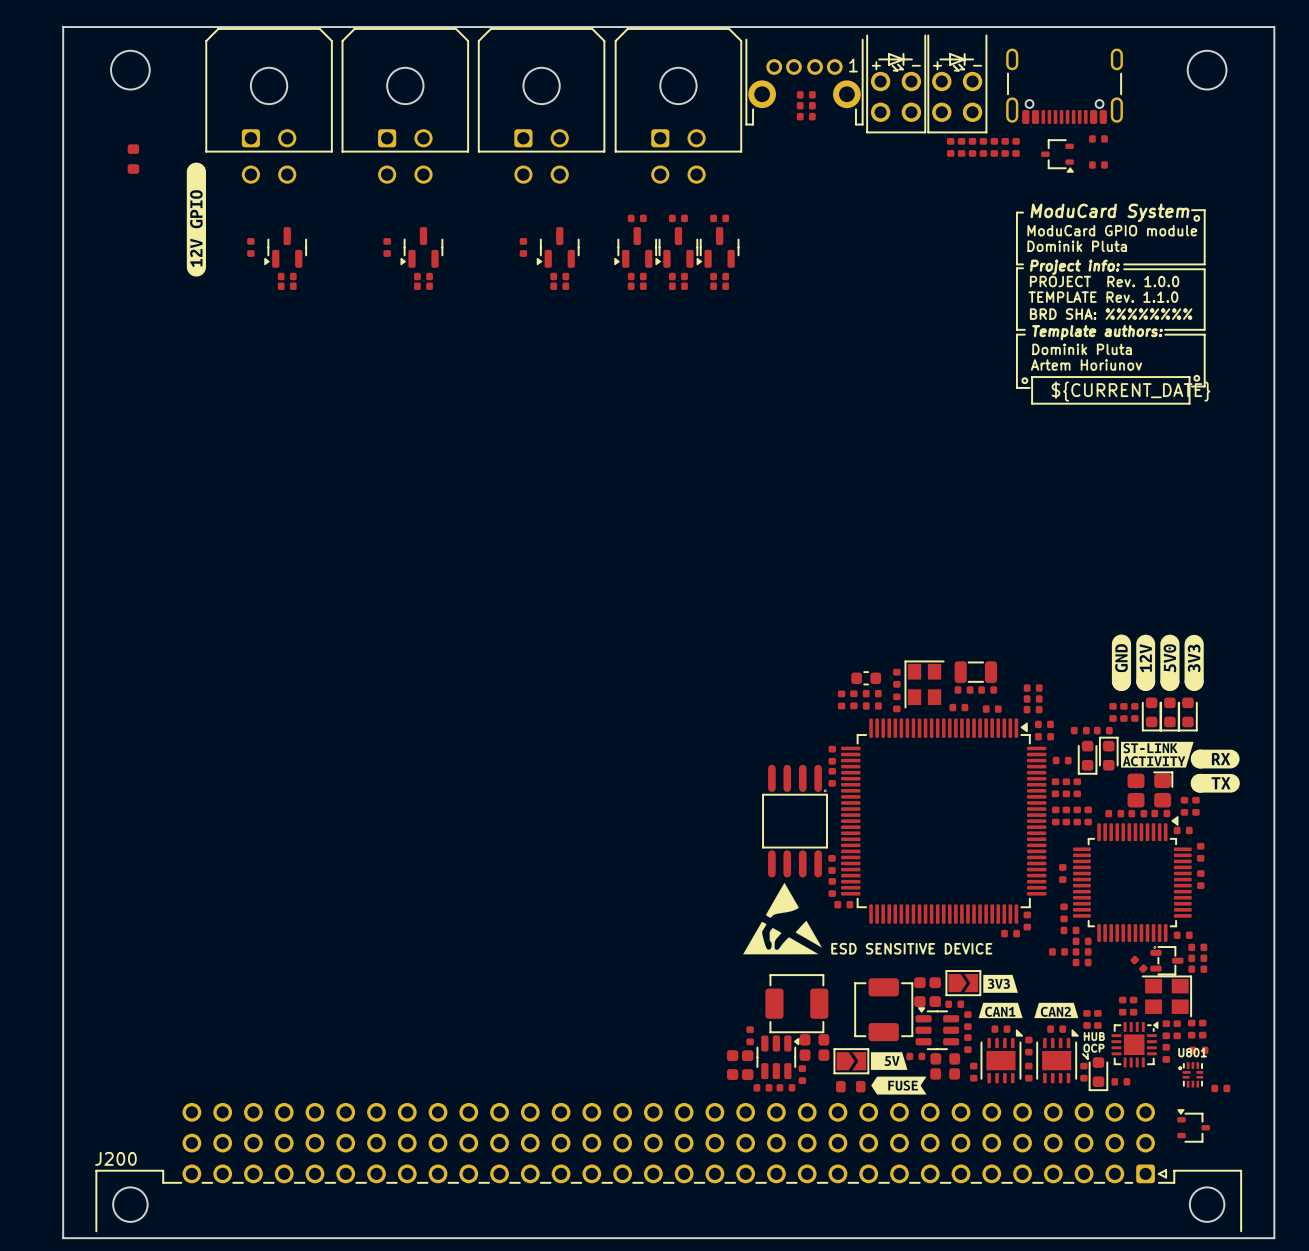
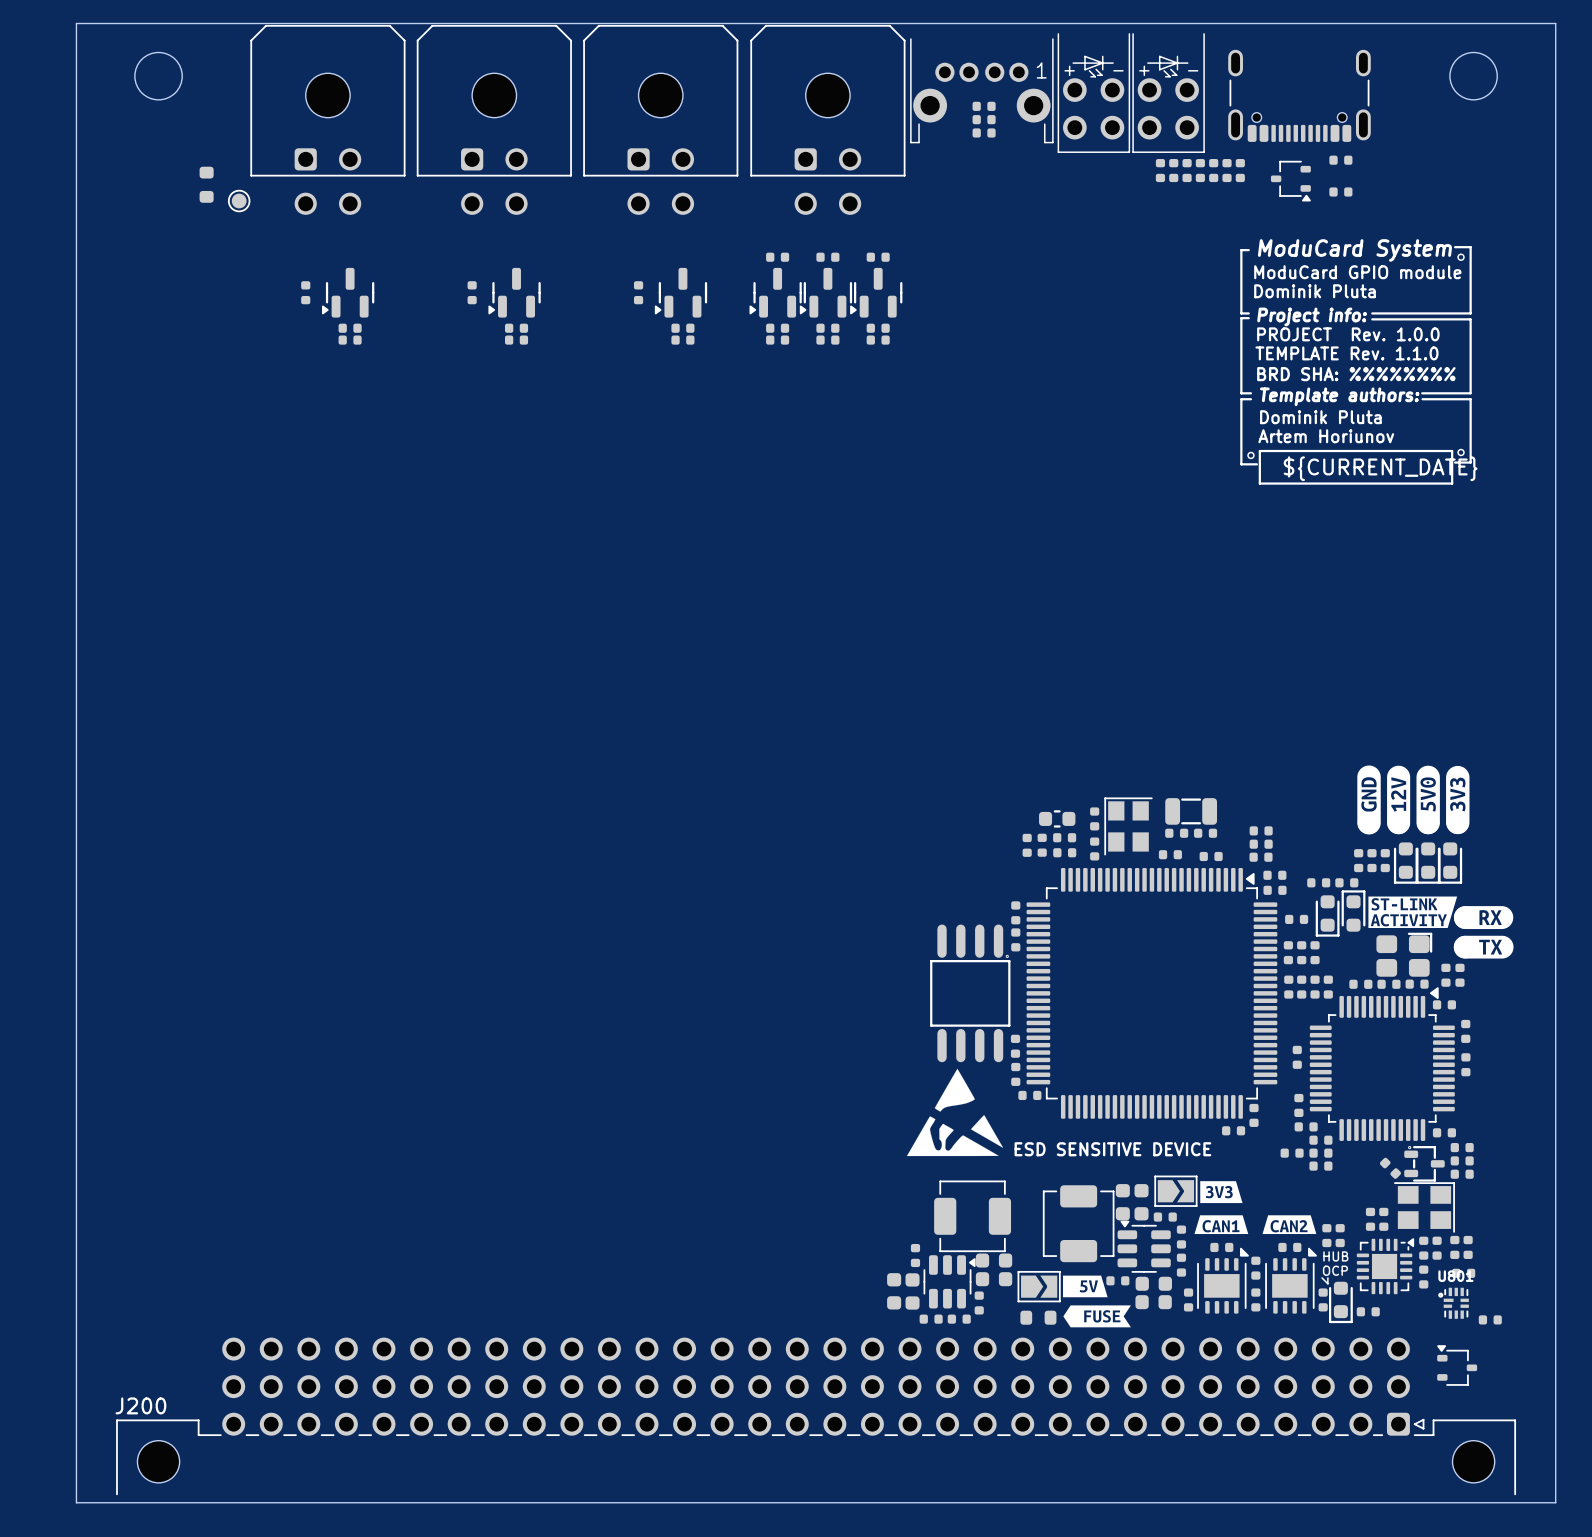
part position: (133, 159) -> (206, 184)
drawing: [186, 162, 206, 277] -> none

